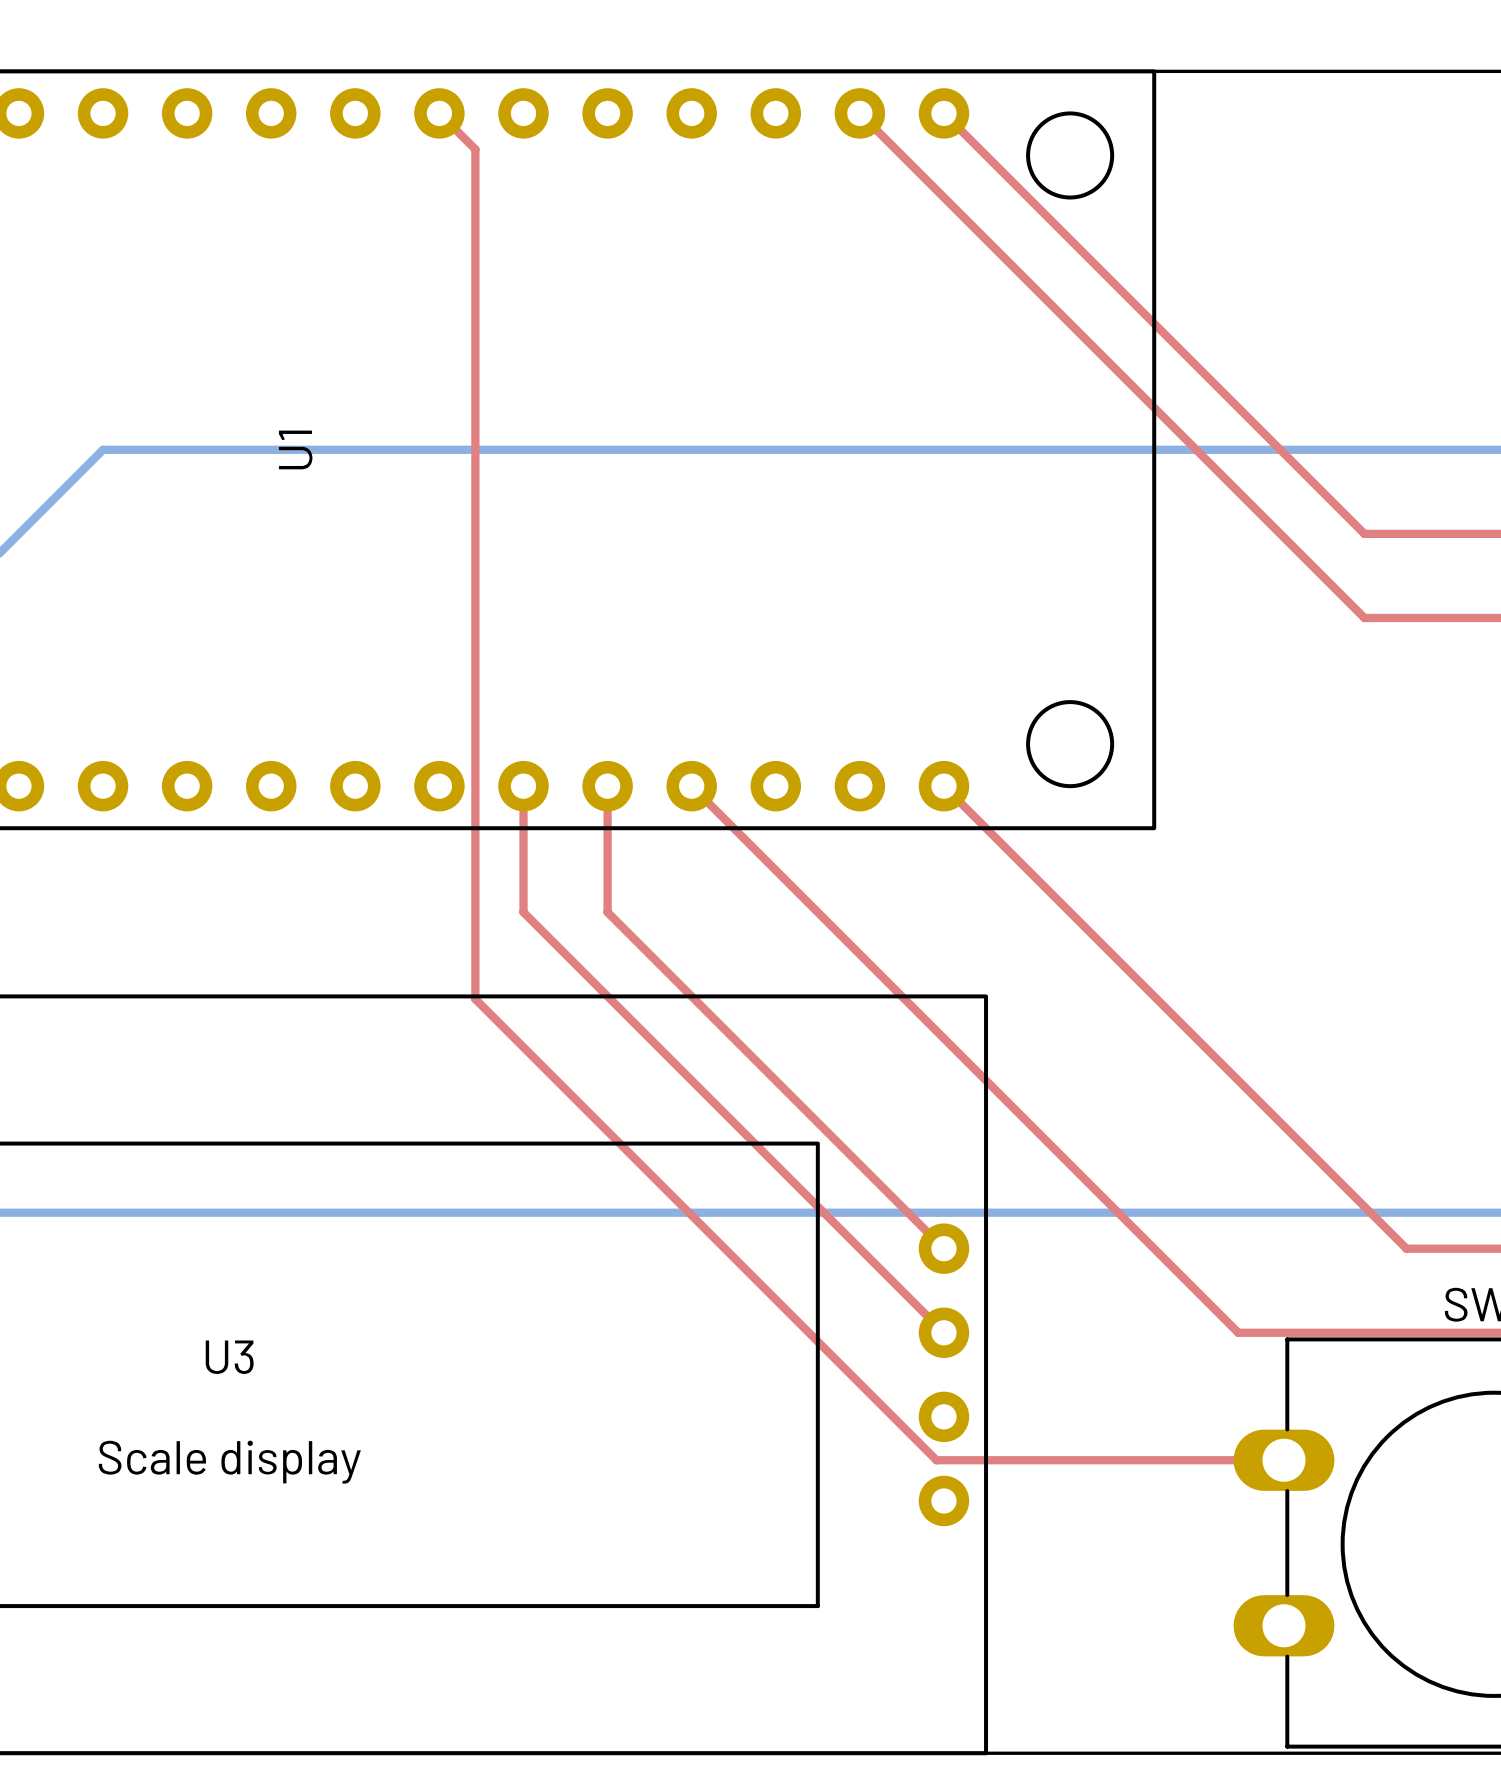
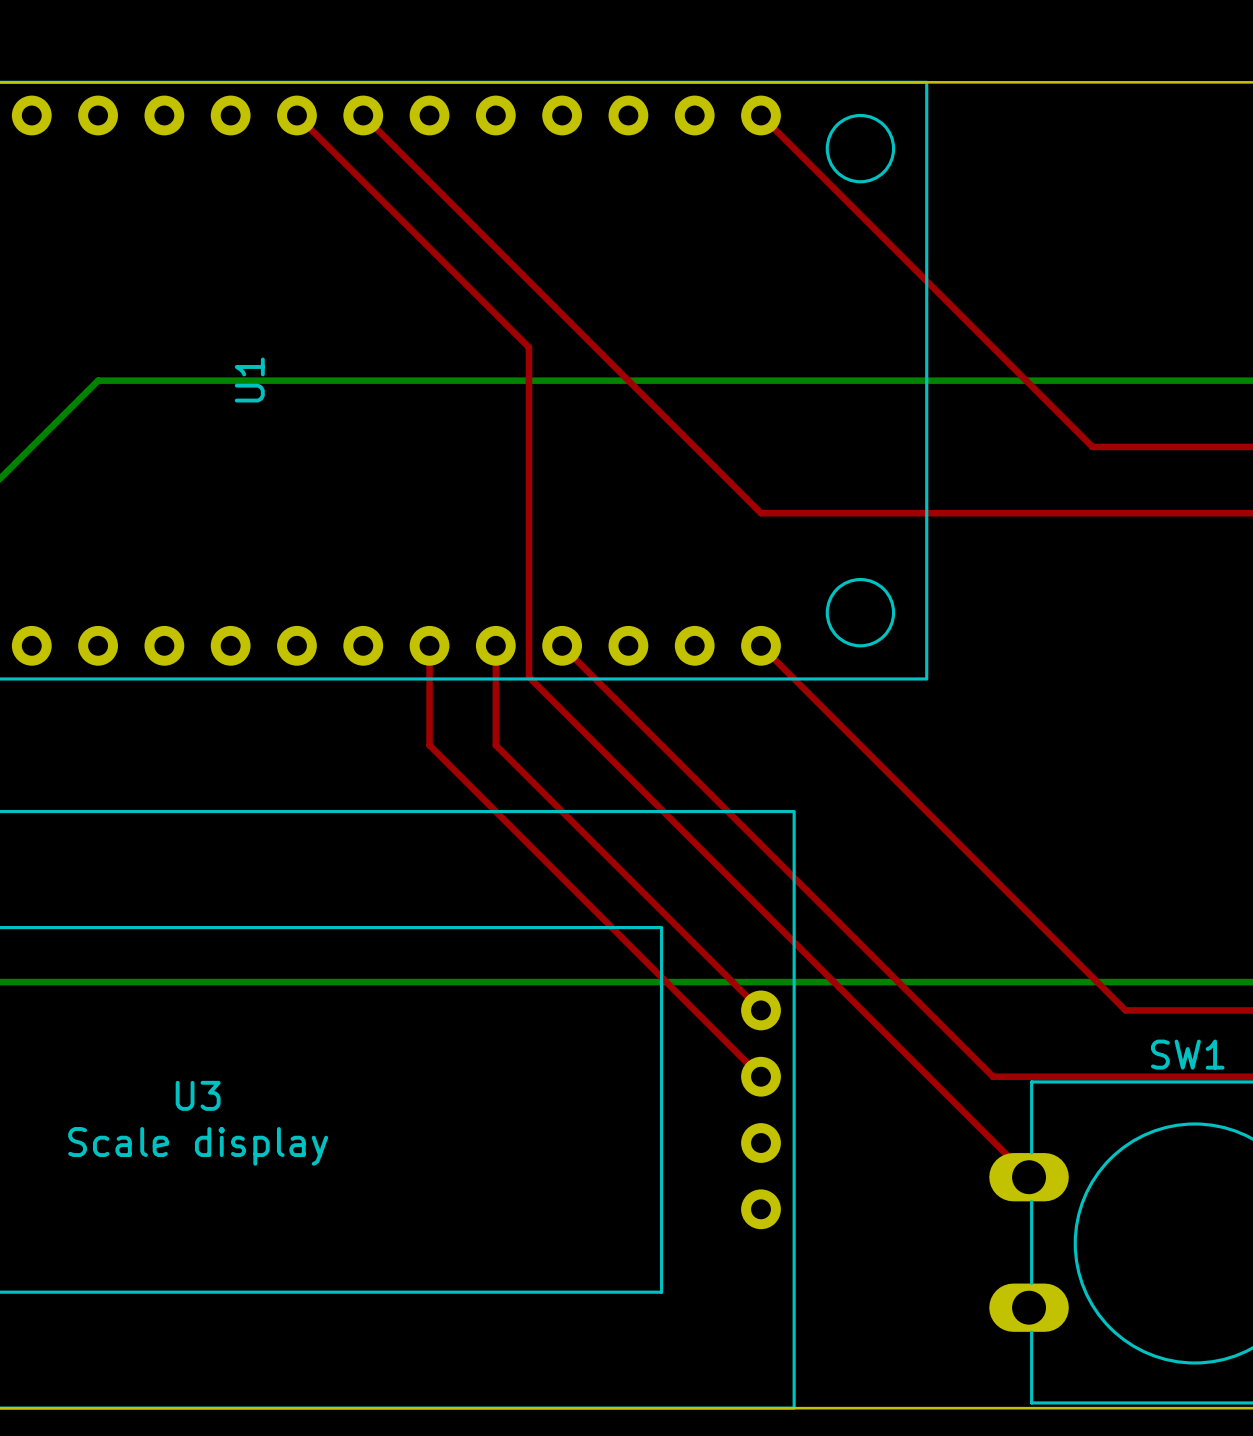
top track: (859, 113) (1364, 617) -> (391, 143) (761, 513) (1092, 513)
top track: (475, 149) (475, 999) (936, 1460) (1283, 1460) -> (296, 115) (528, 347) (528, 677) (1029, 1177)
text position: Scale display (229, 1462) -> Scale display (198, 1146)

